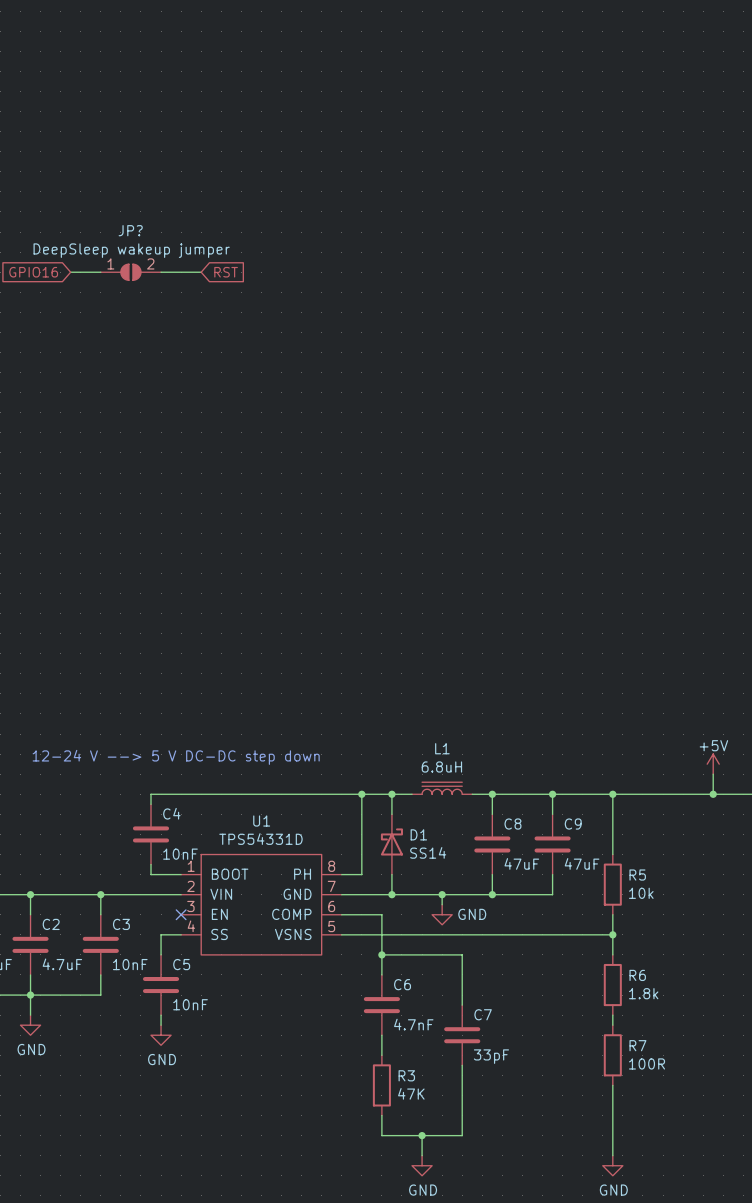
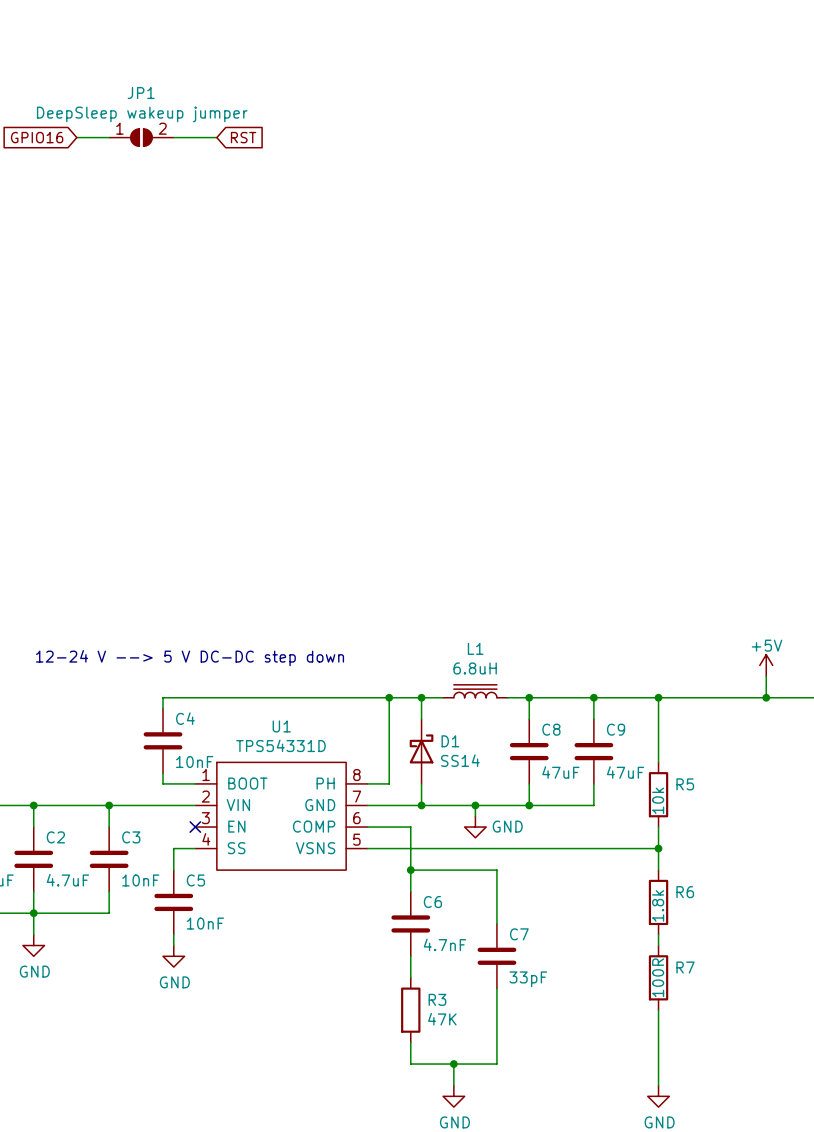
JP? name: JP? (130, 230) -> JP1 (141, 93)
R5 value rotation: 0° (641, 893) -> 90° counterclockwise (658, 800)
R6 value rotation: 0° (643, 993) -> 90° counterclockwise (658, 905)
R7 value rotation: 0° (647, 1063) -> 90° counterclockwise (658, 977)

